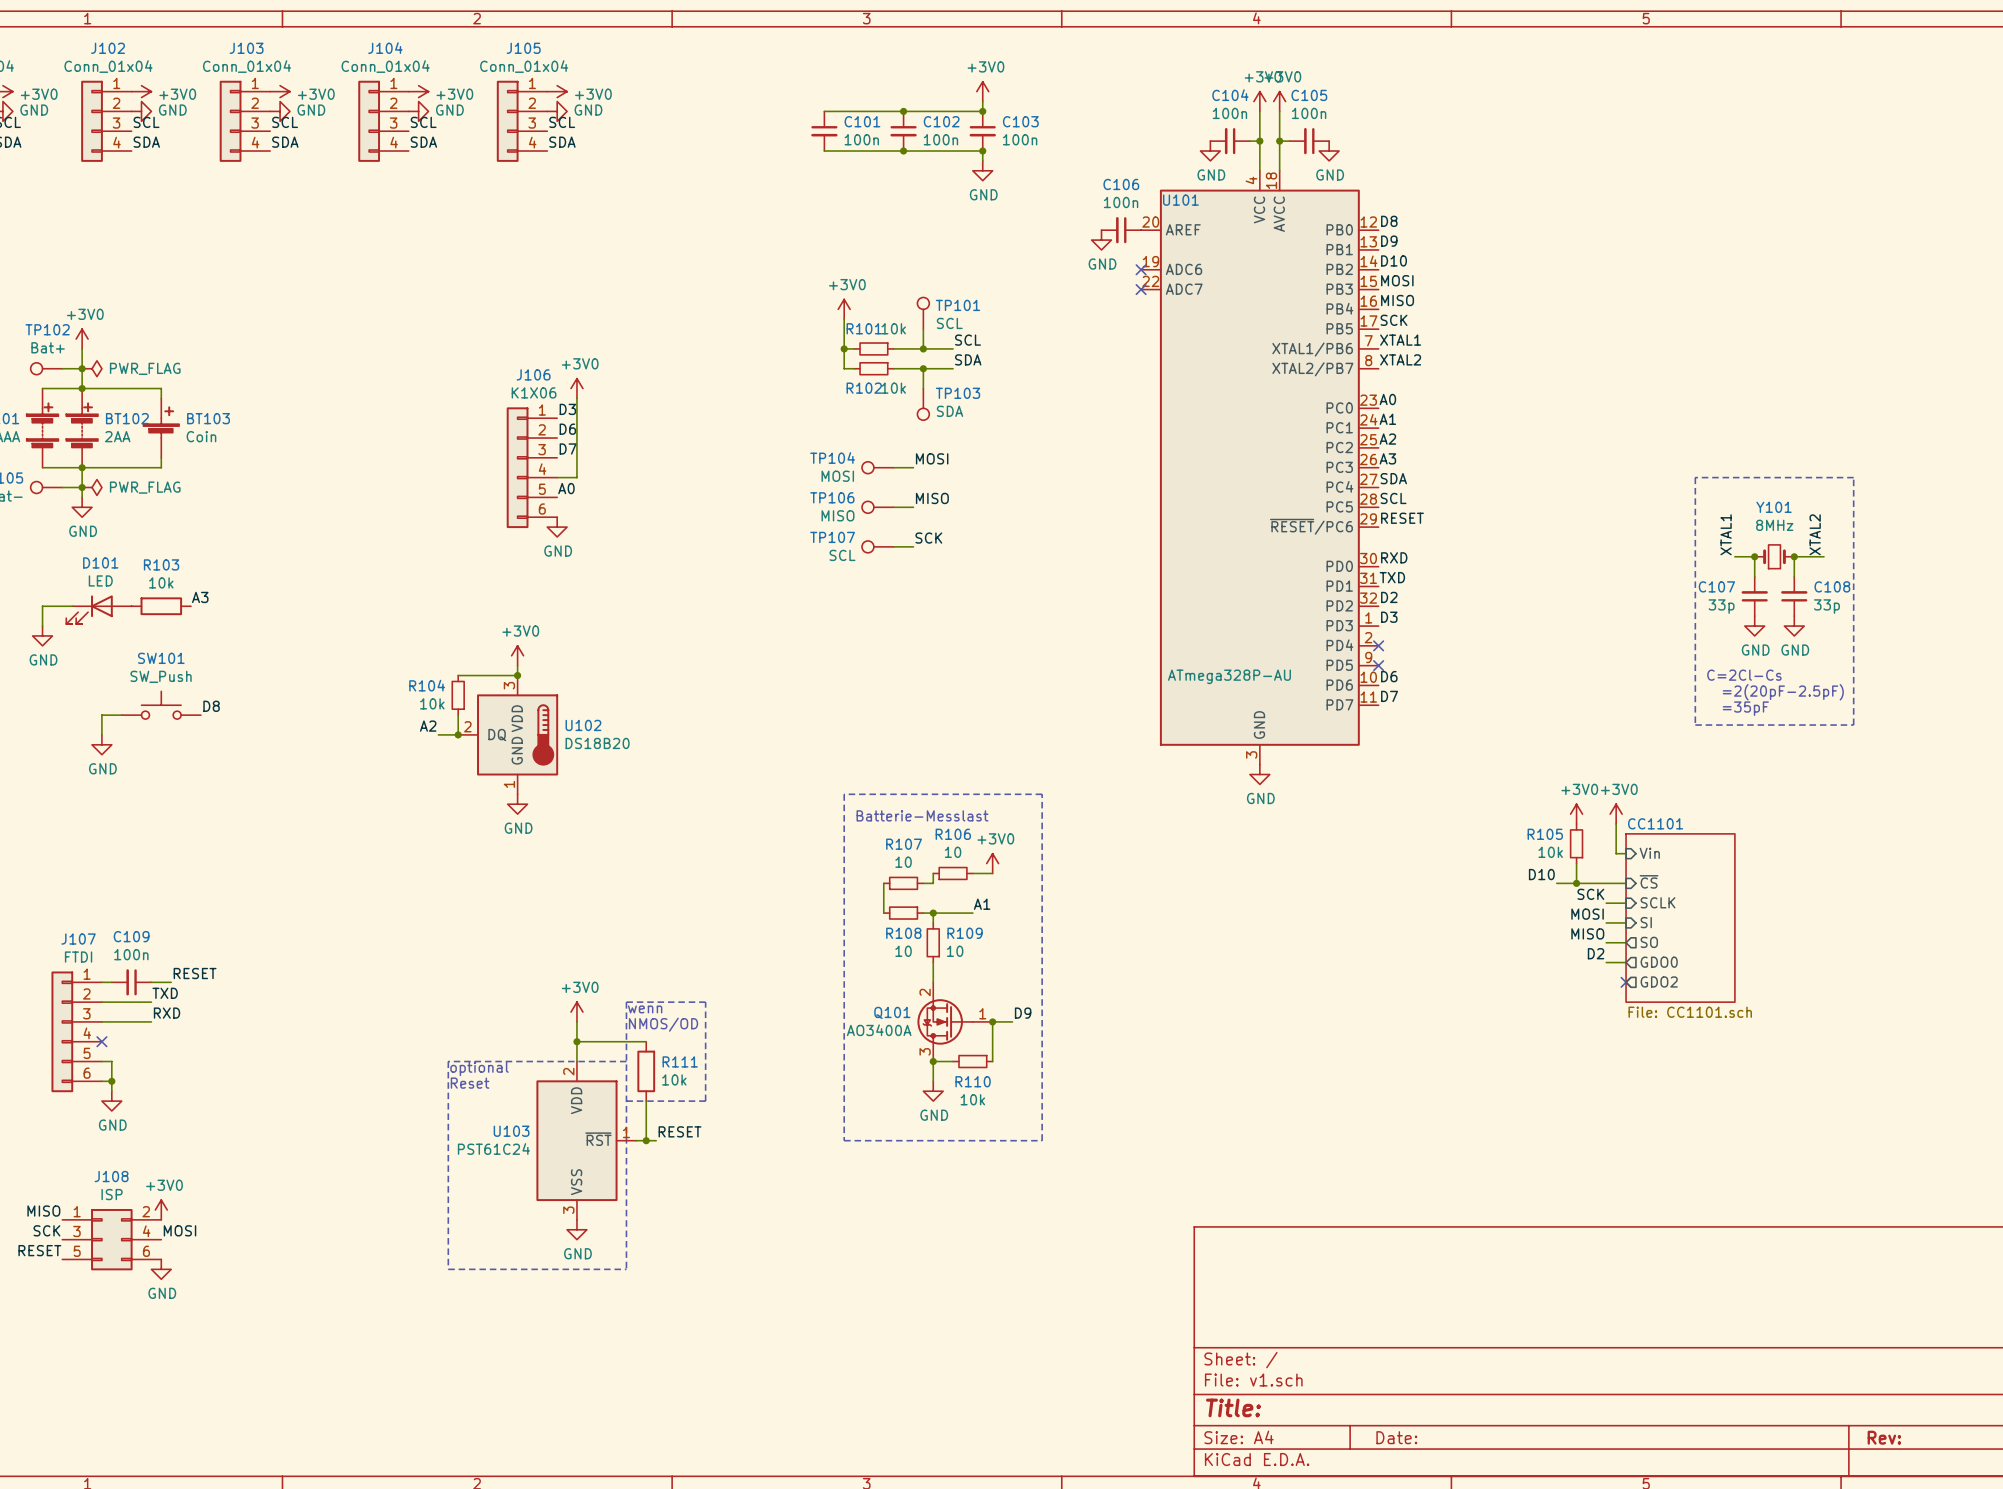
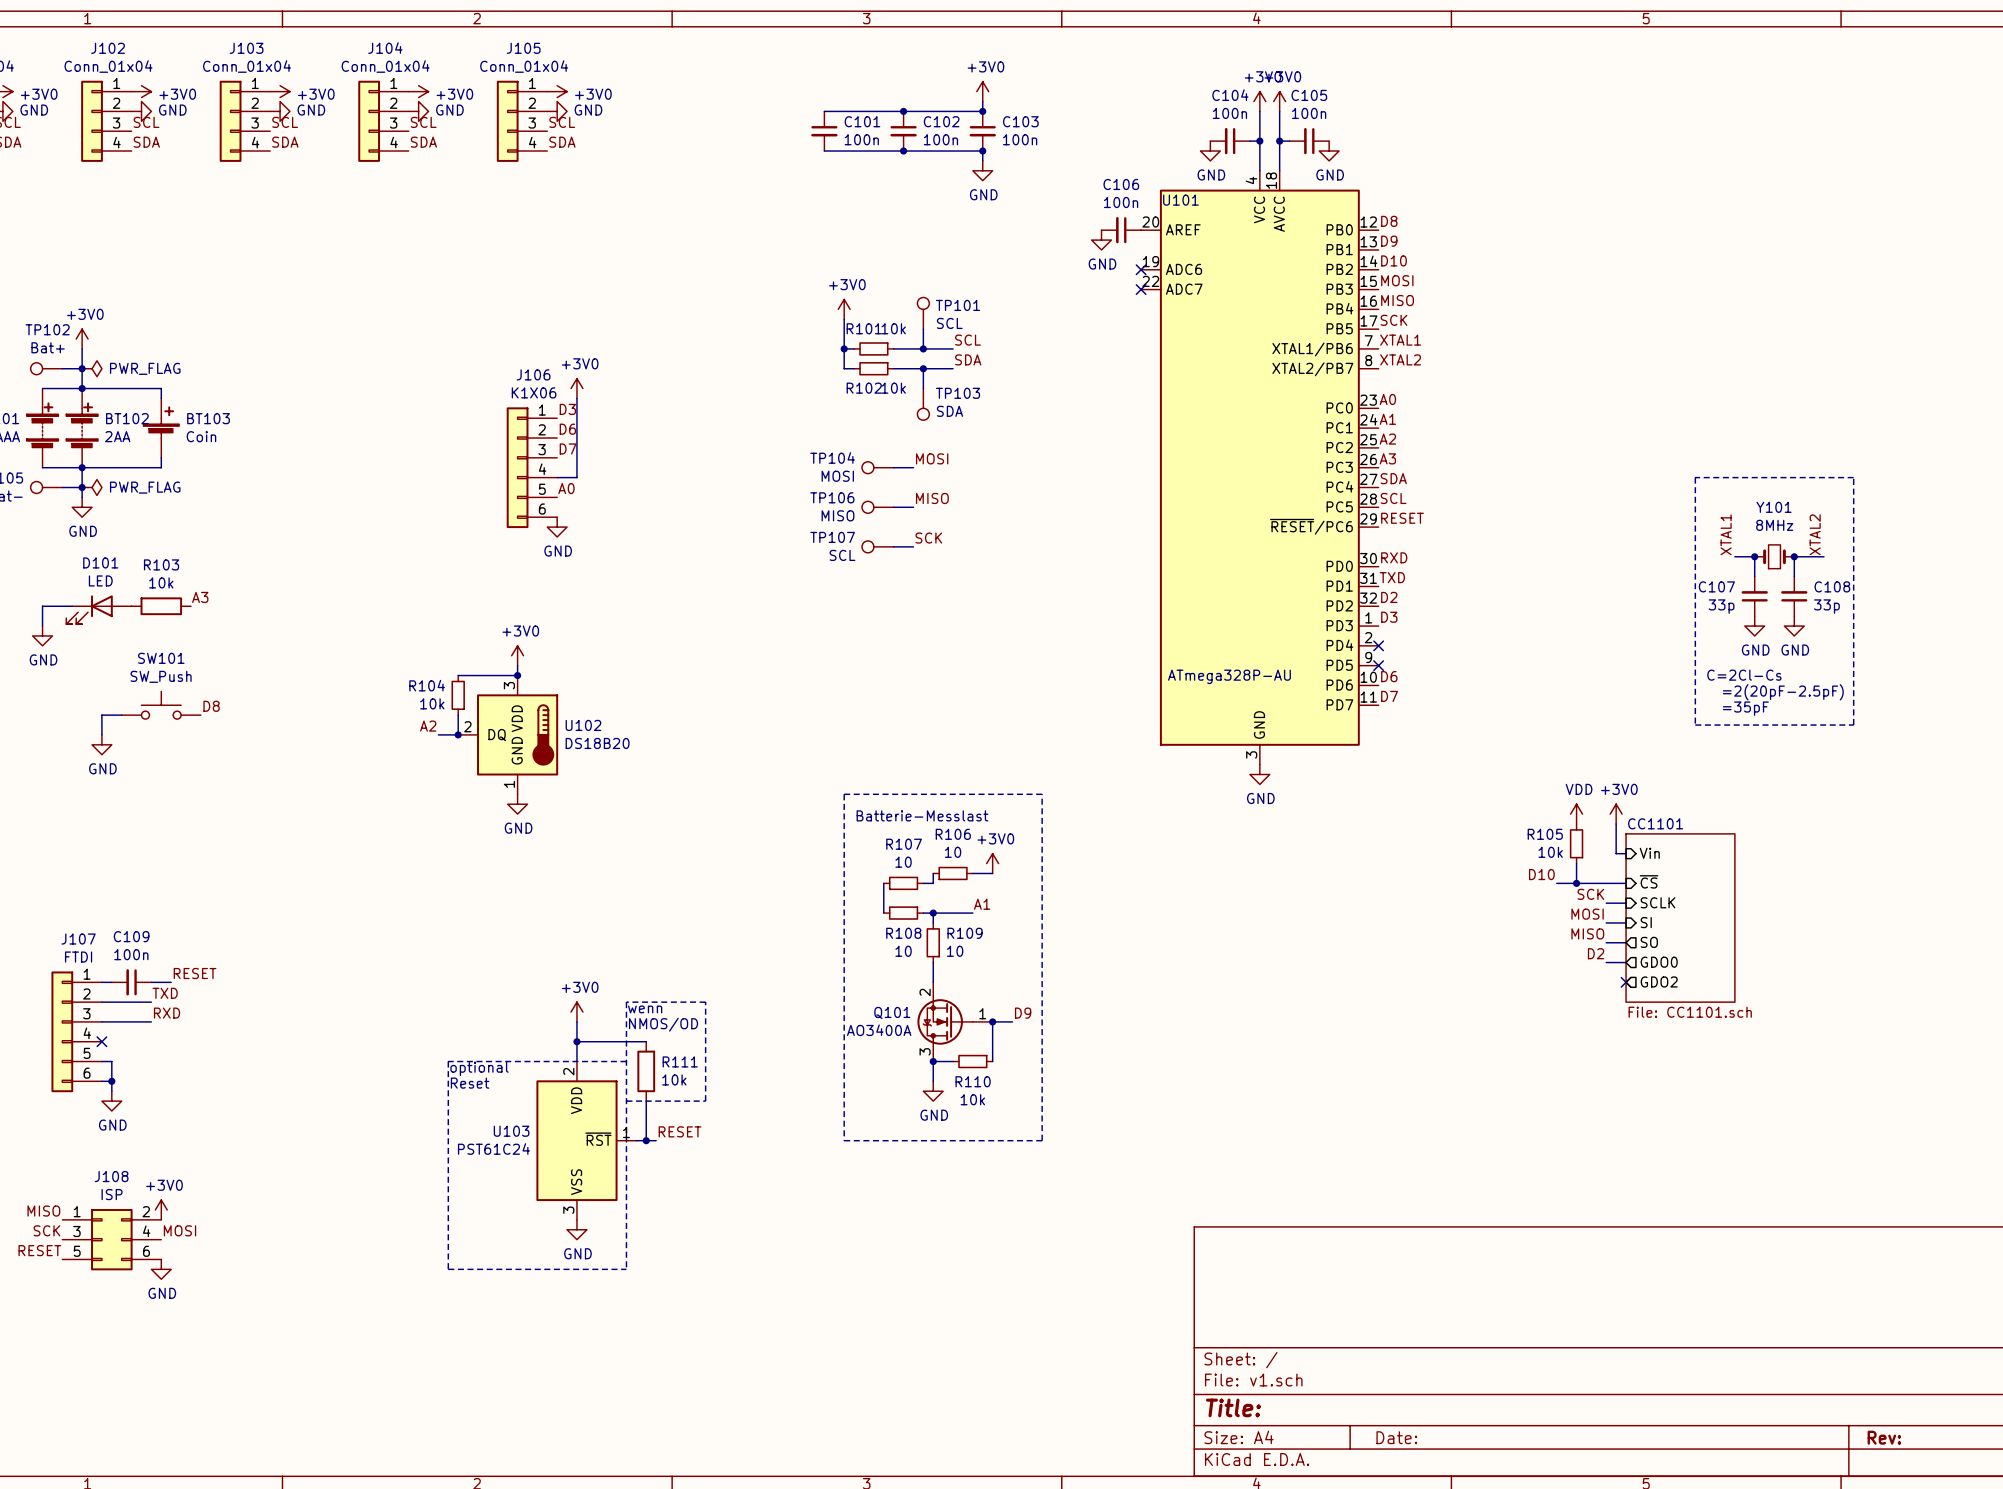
power symbol: +3V0 (1576, 814) -> VDD (1576, 814)

